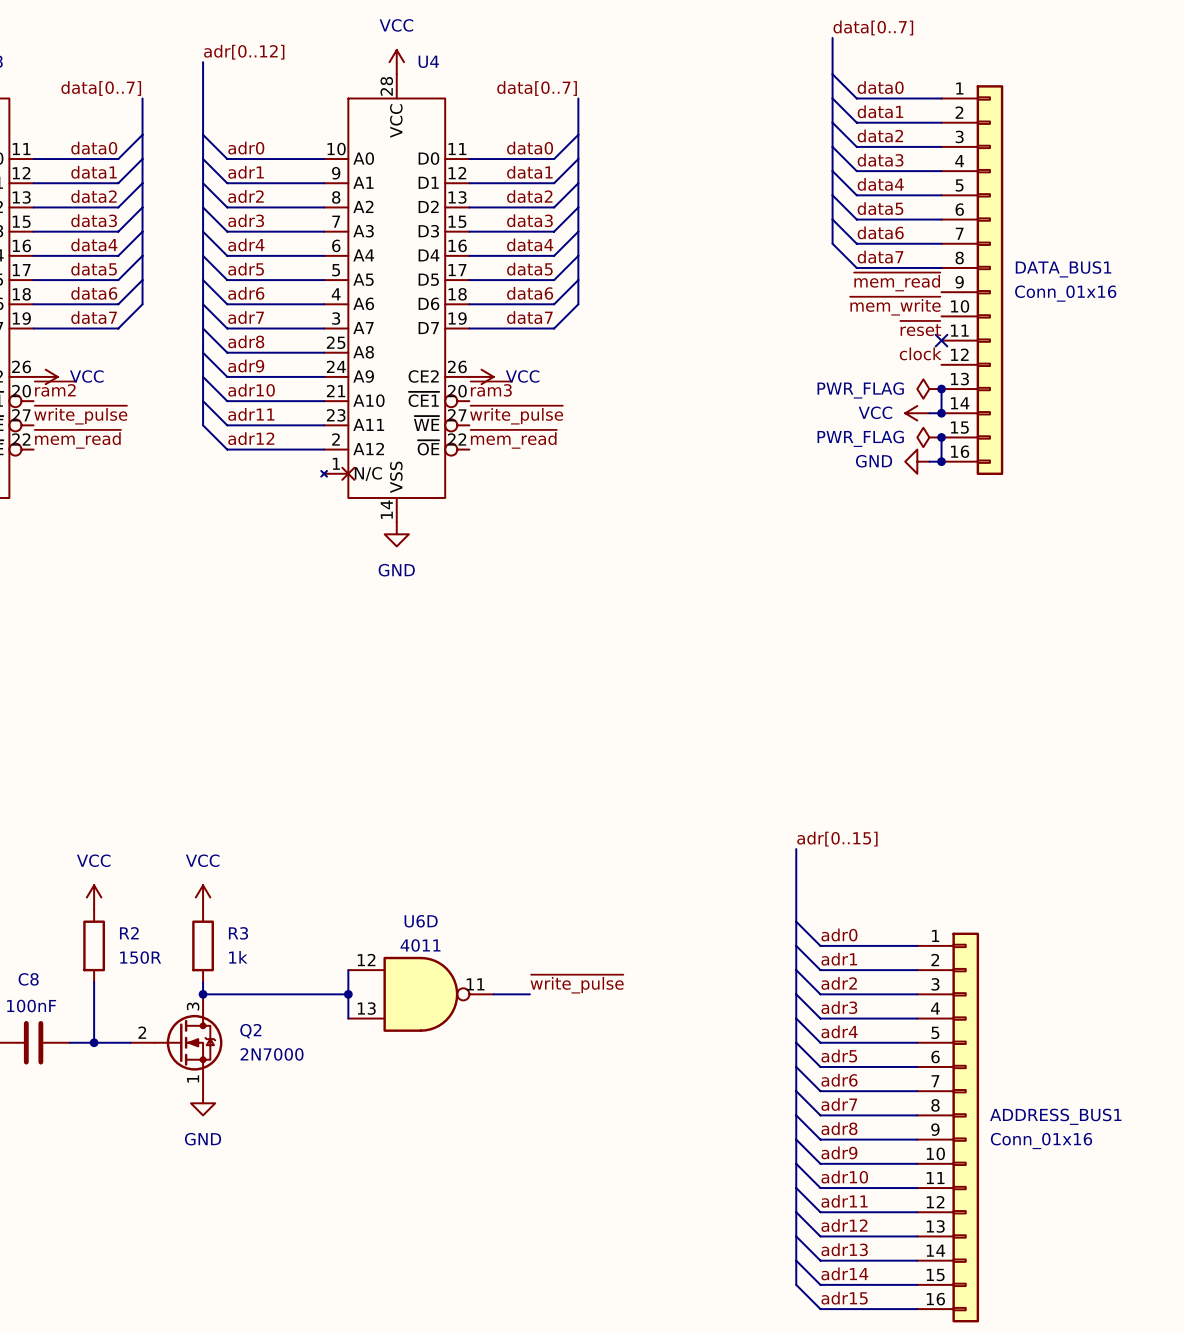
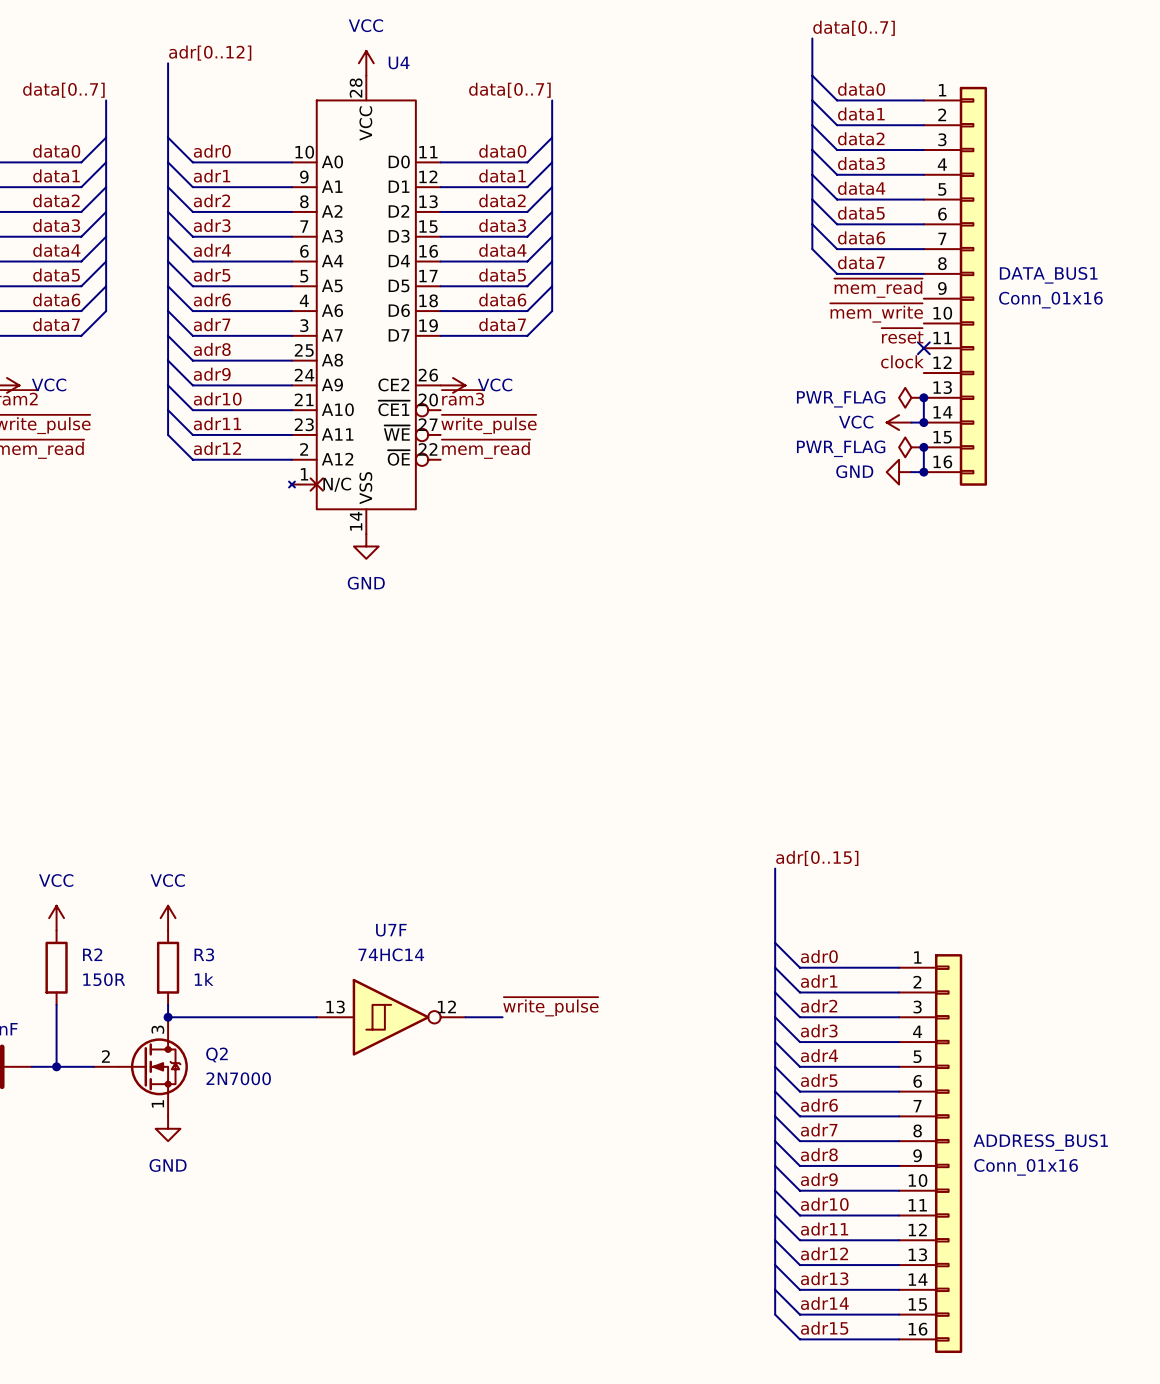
wire: (348, 970) (348, 1018) -> none
junction: (348, 994) -> none
U6D: 4011 (420, 994) -> none
U7F: none -> 74HC14 (391, 1017)

